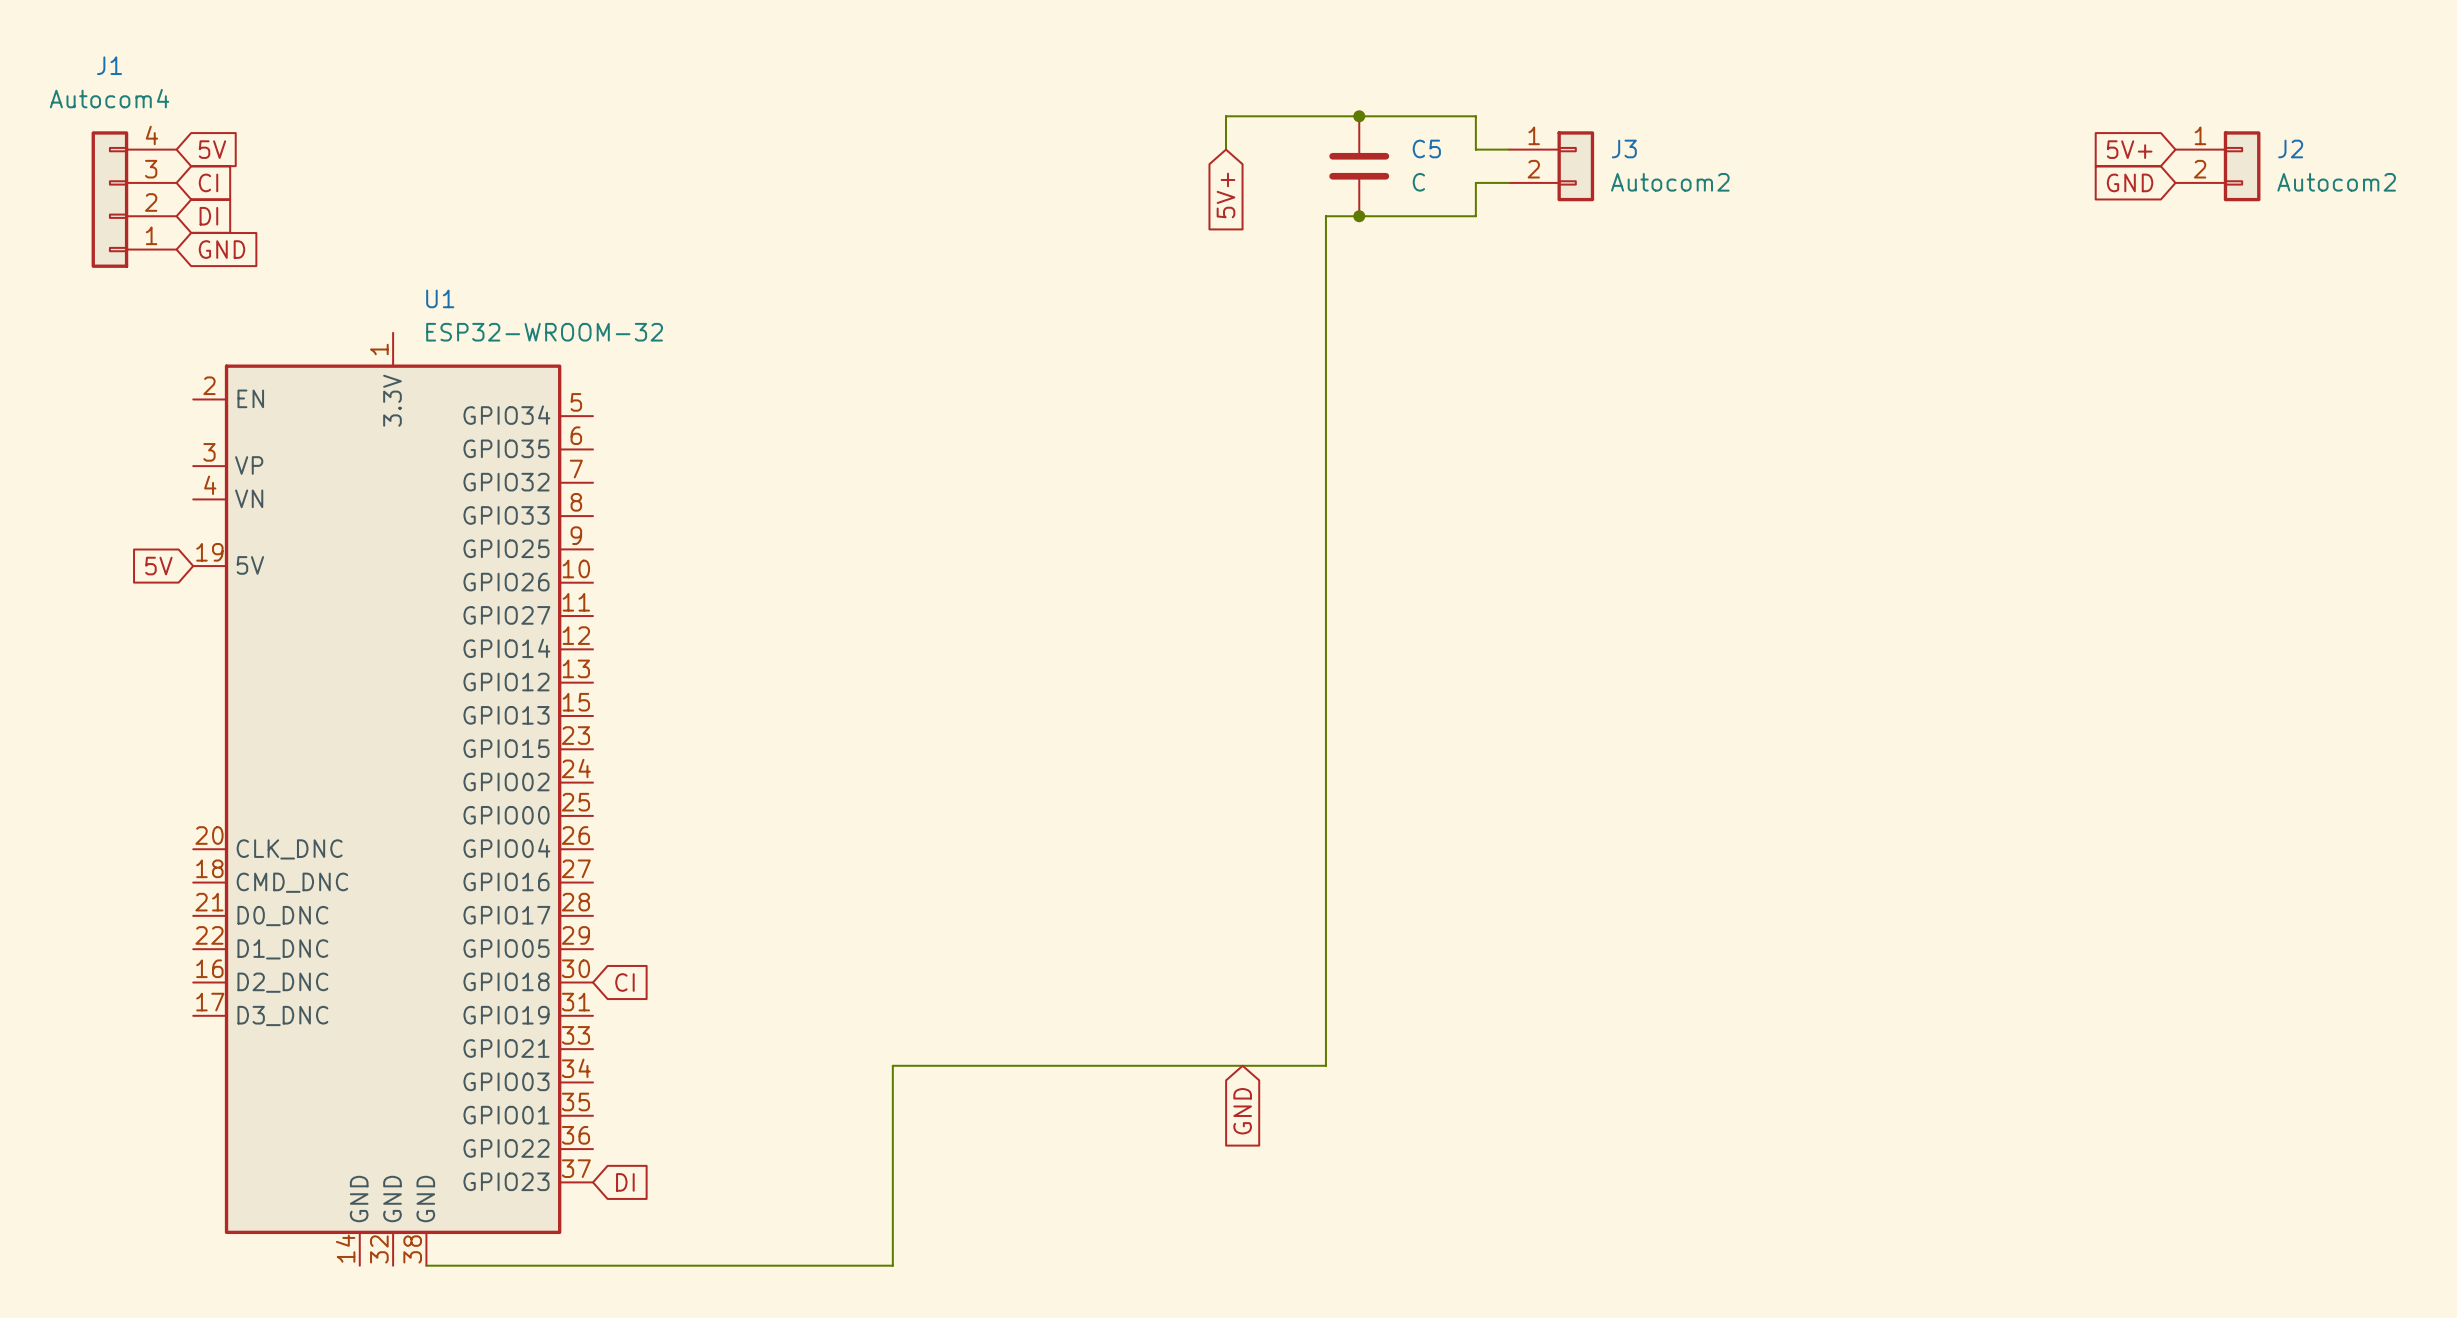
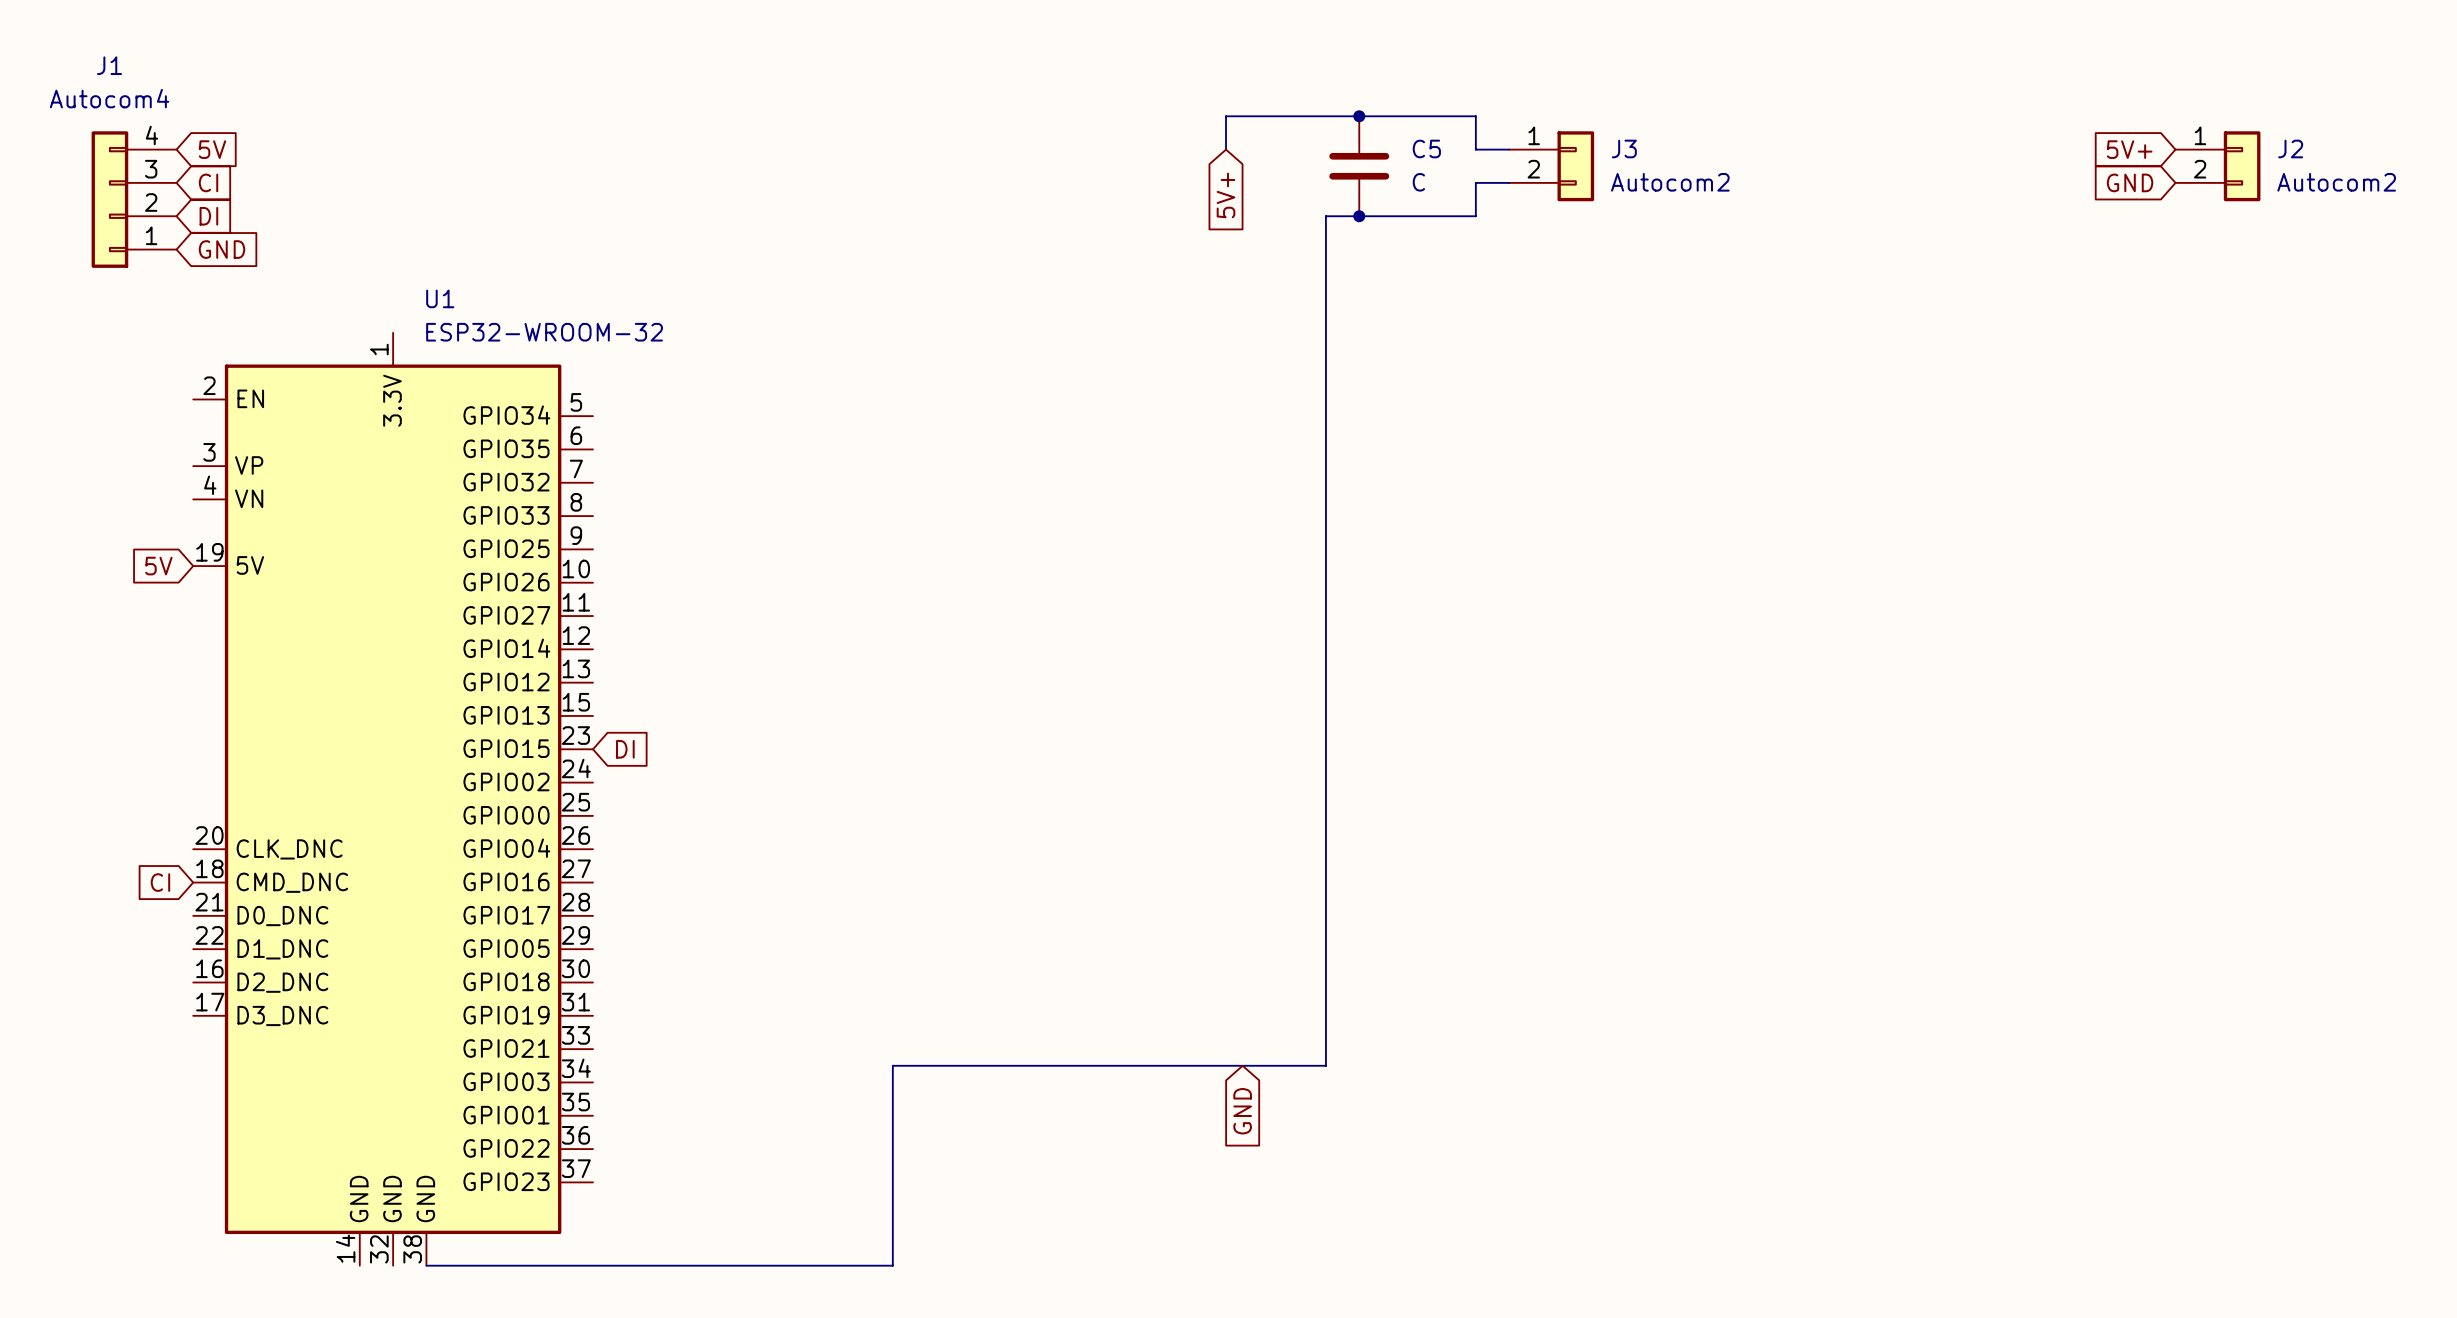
global label: none -> DI (625, 749)
global label: none -> CI (160, 882)
global label: CI (624, 982) -> none
global label: DI (625, 1182) -> none

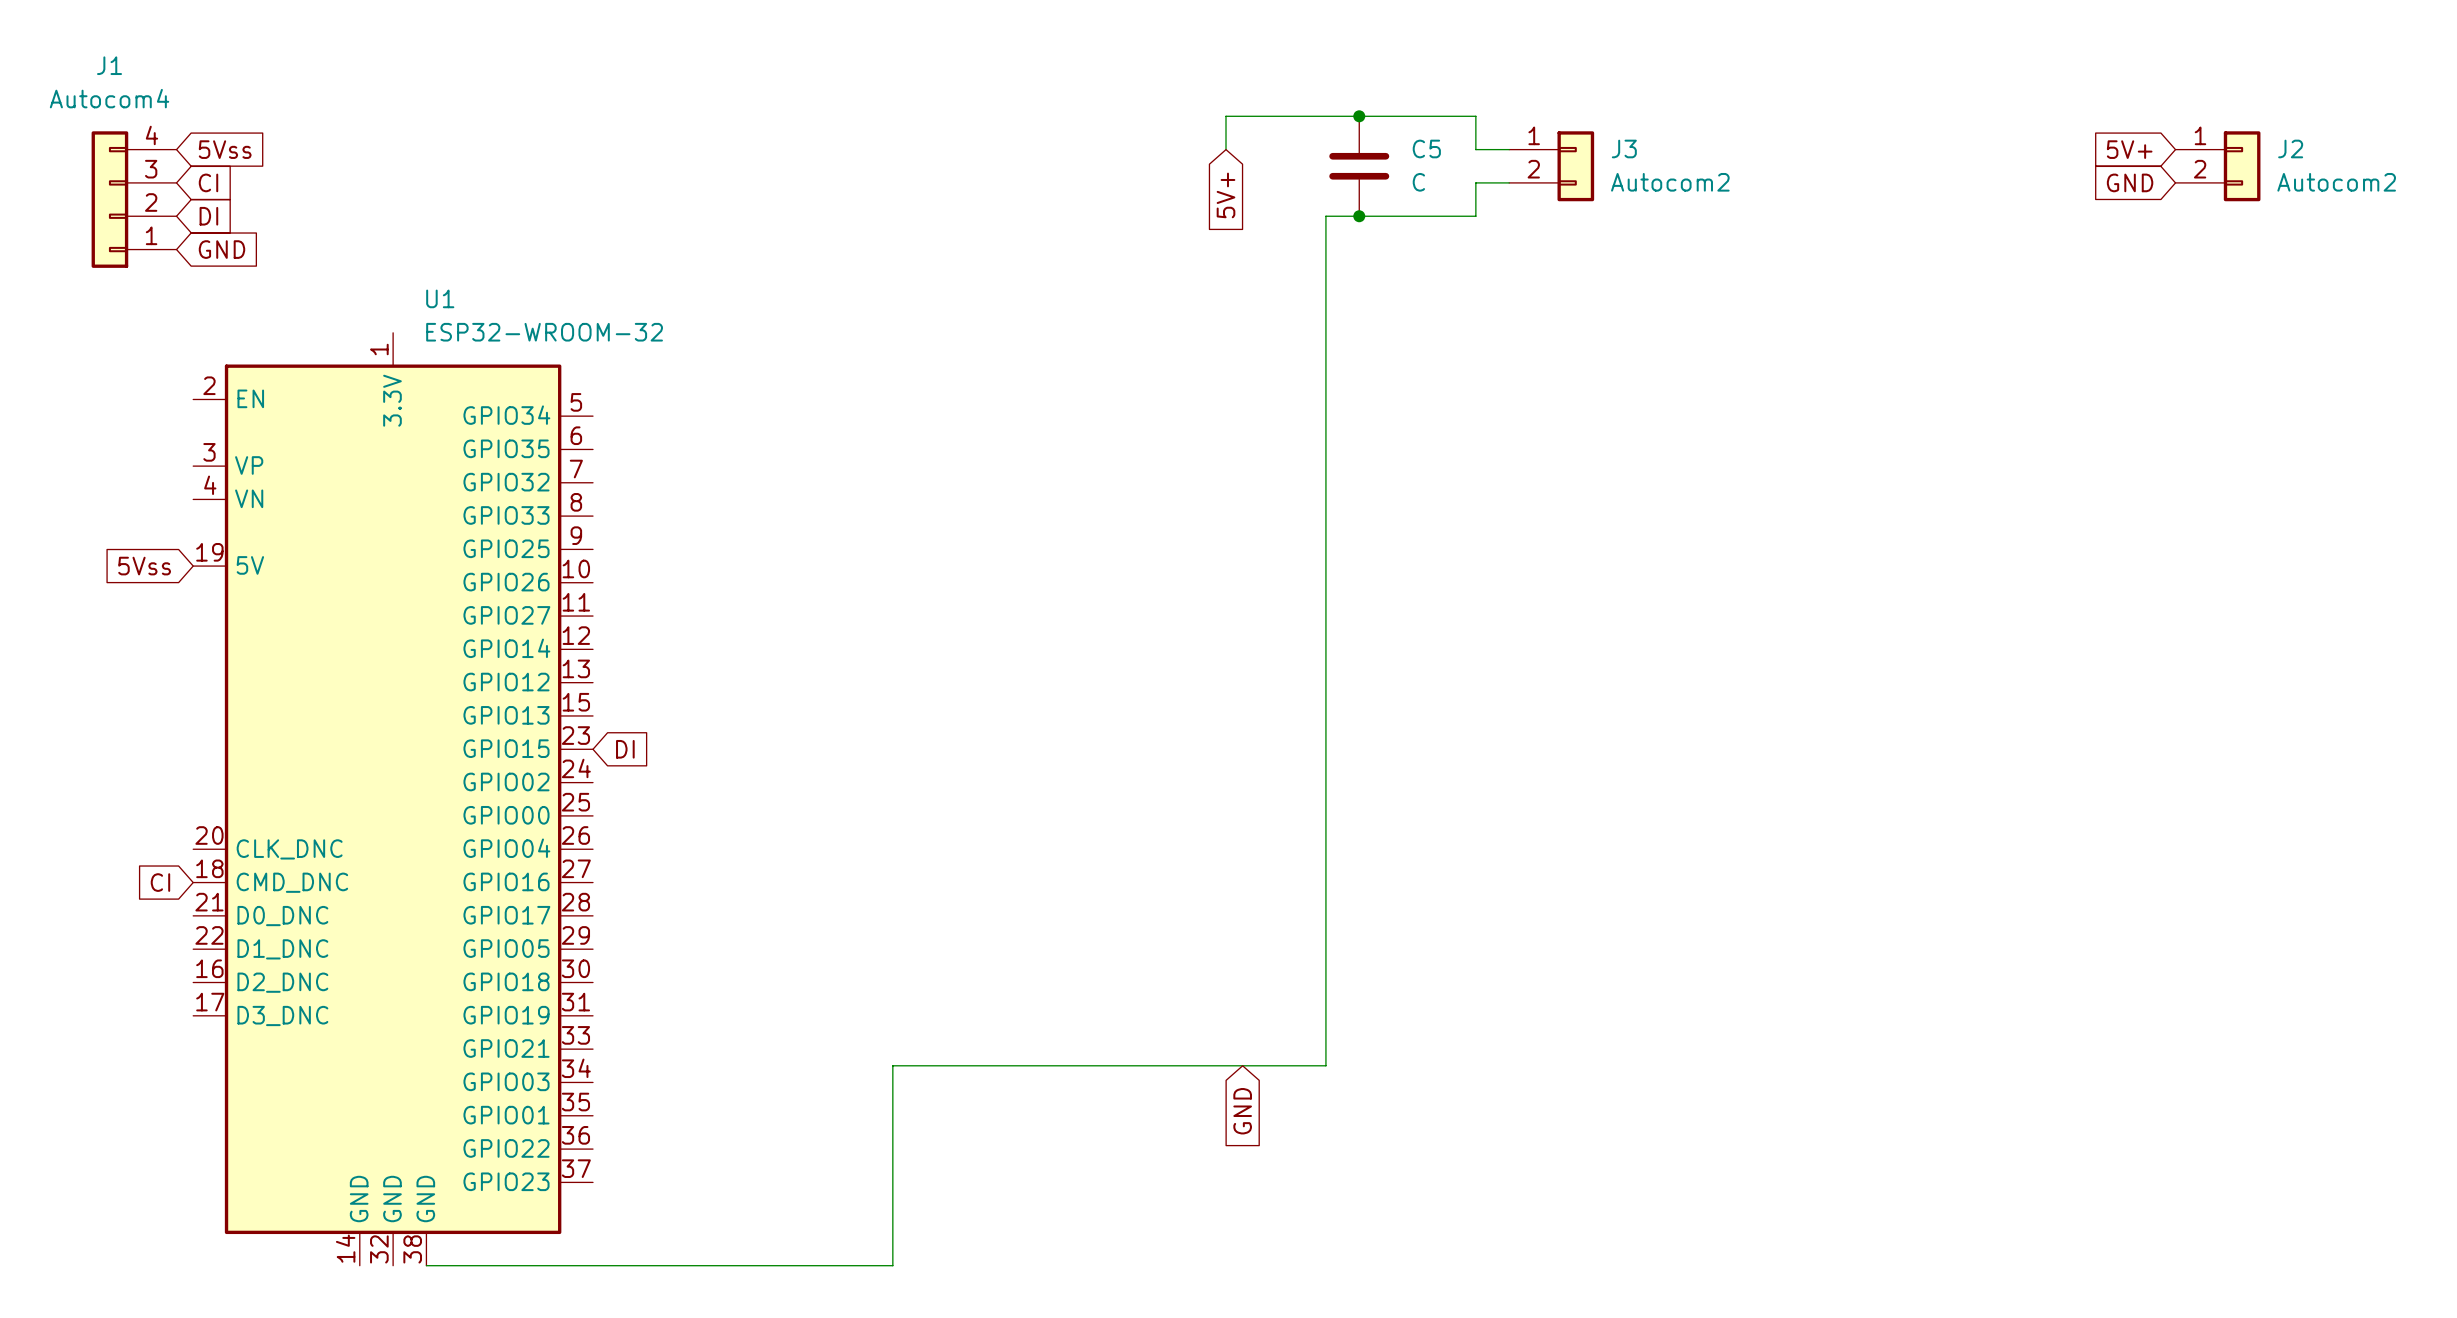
global label: 5V (212, 149) -> 5Vss (225, 149)
global label: 5V (158, 566) -> 5Vss (144, 566)

